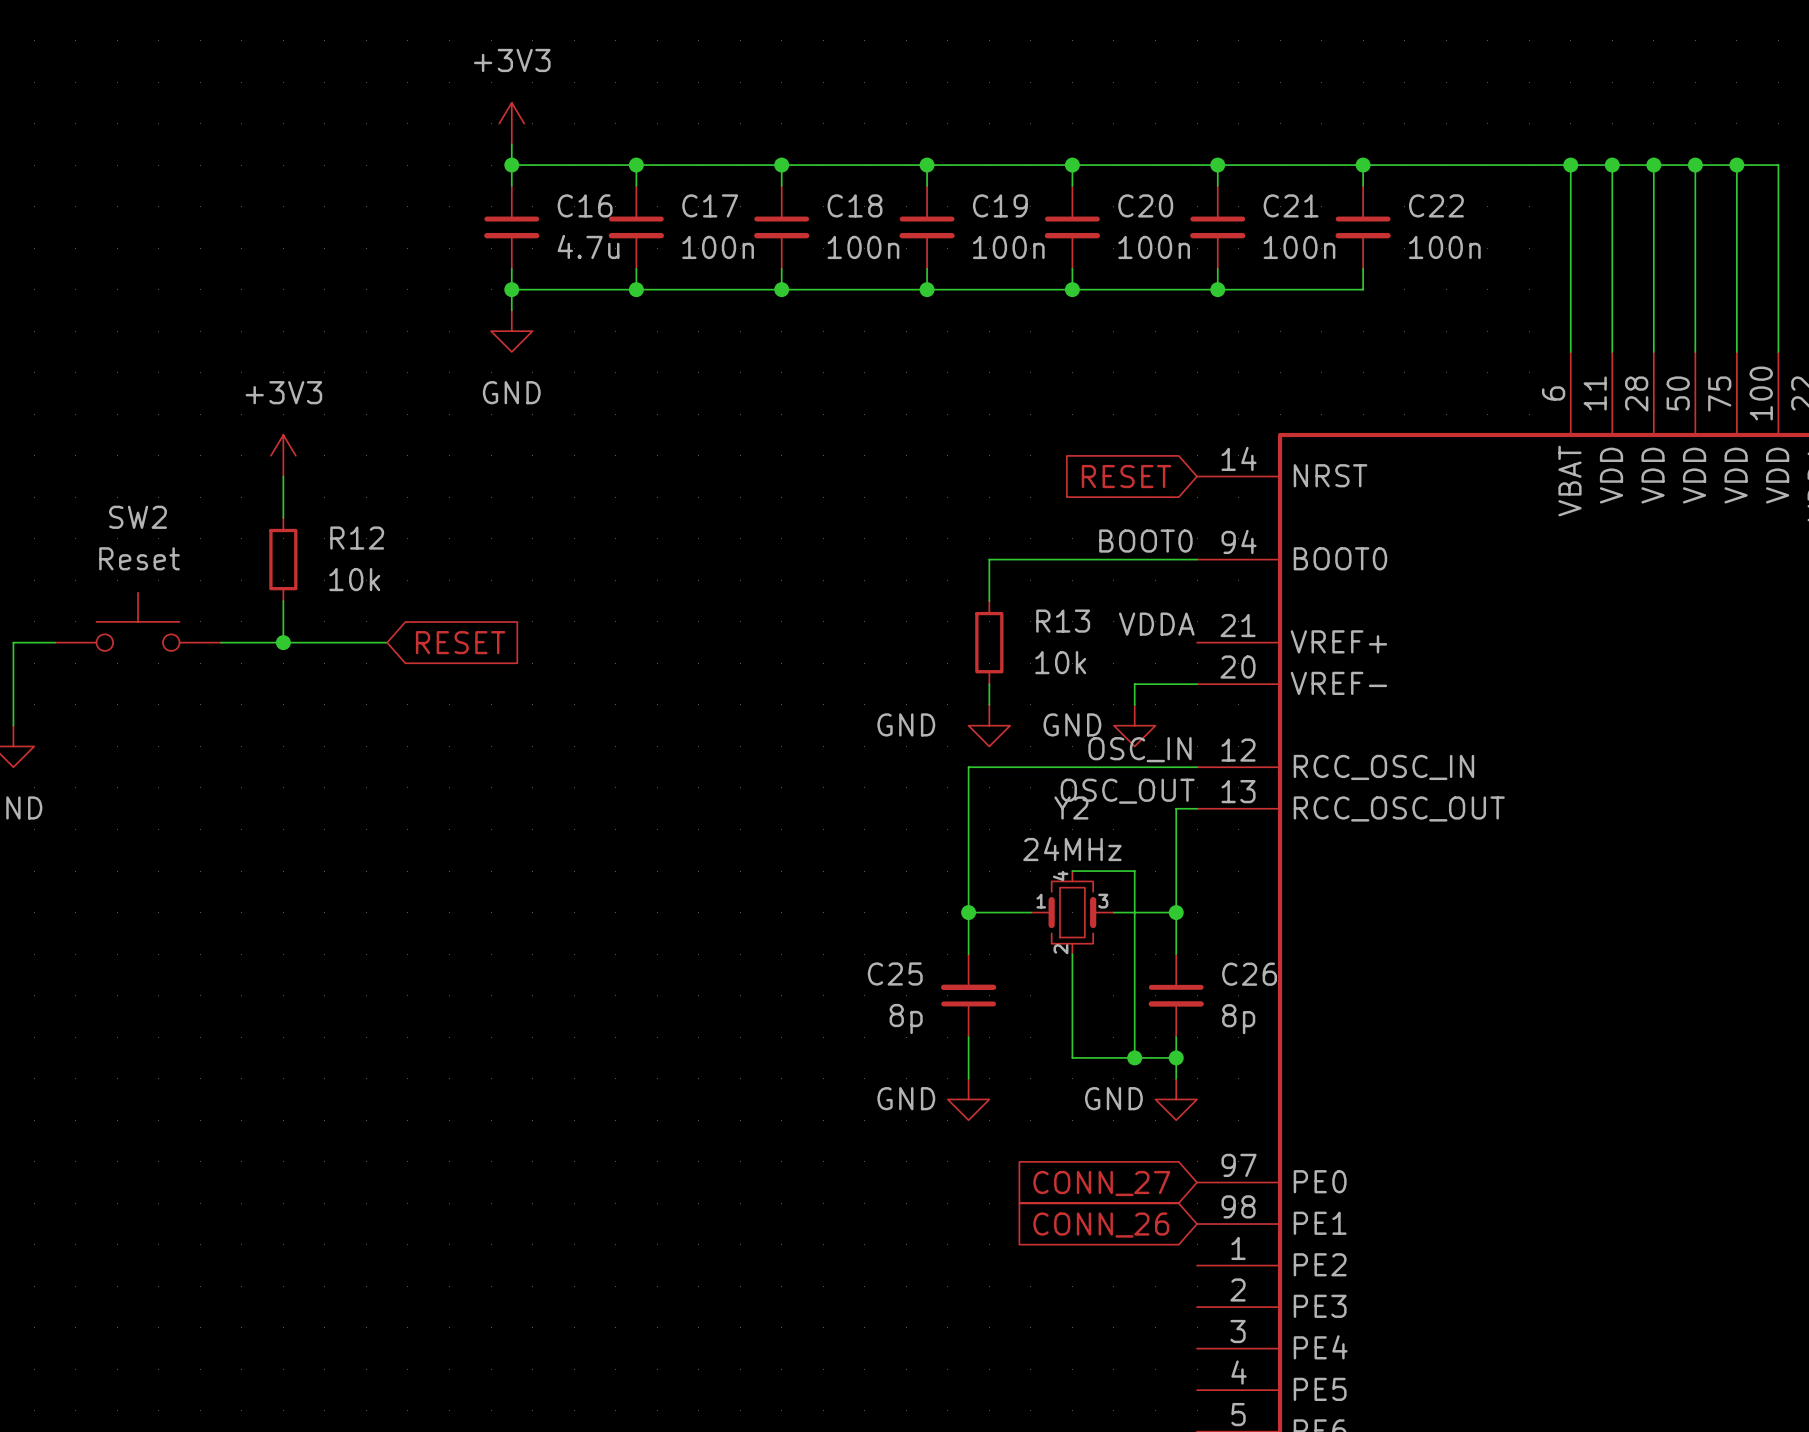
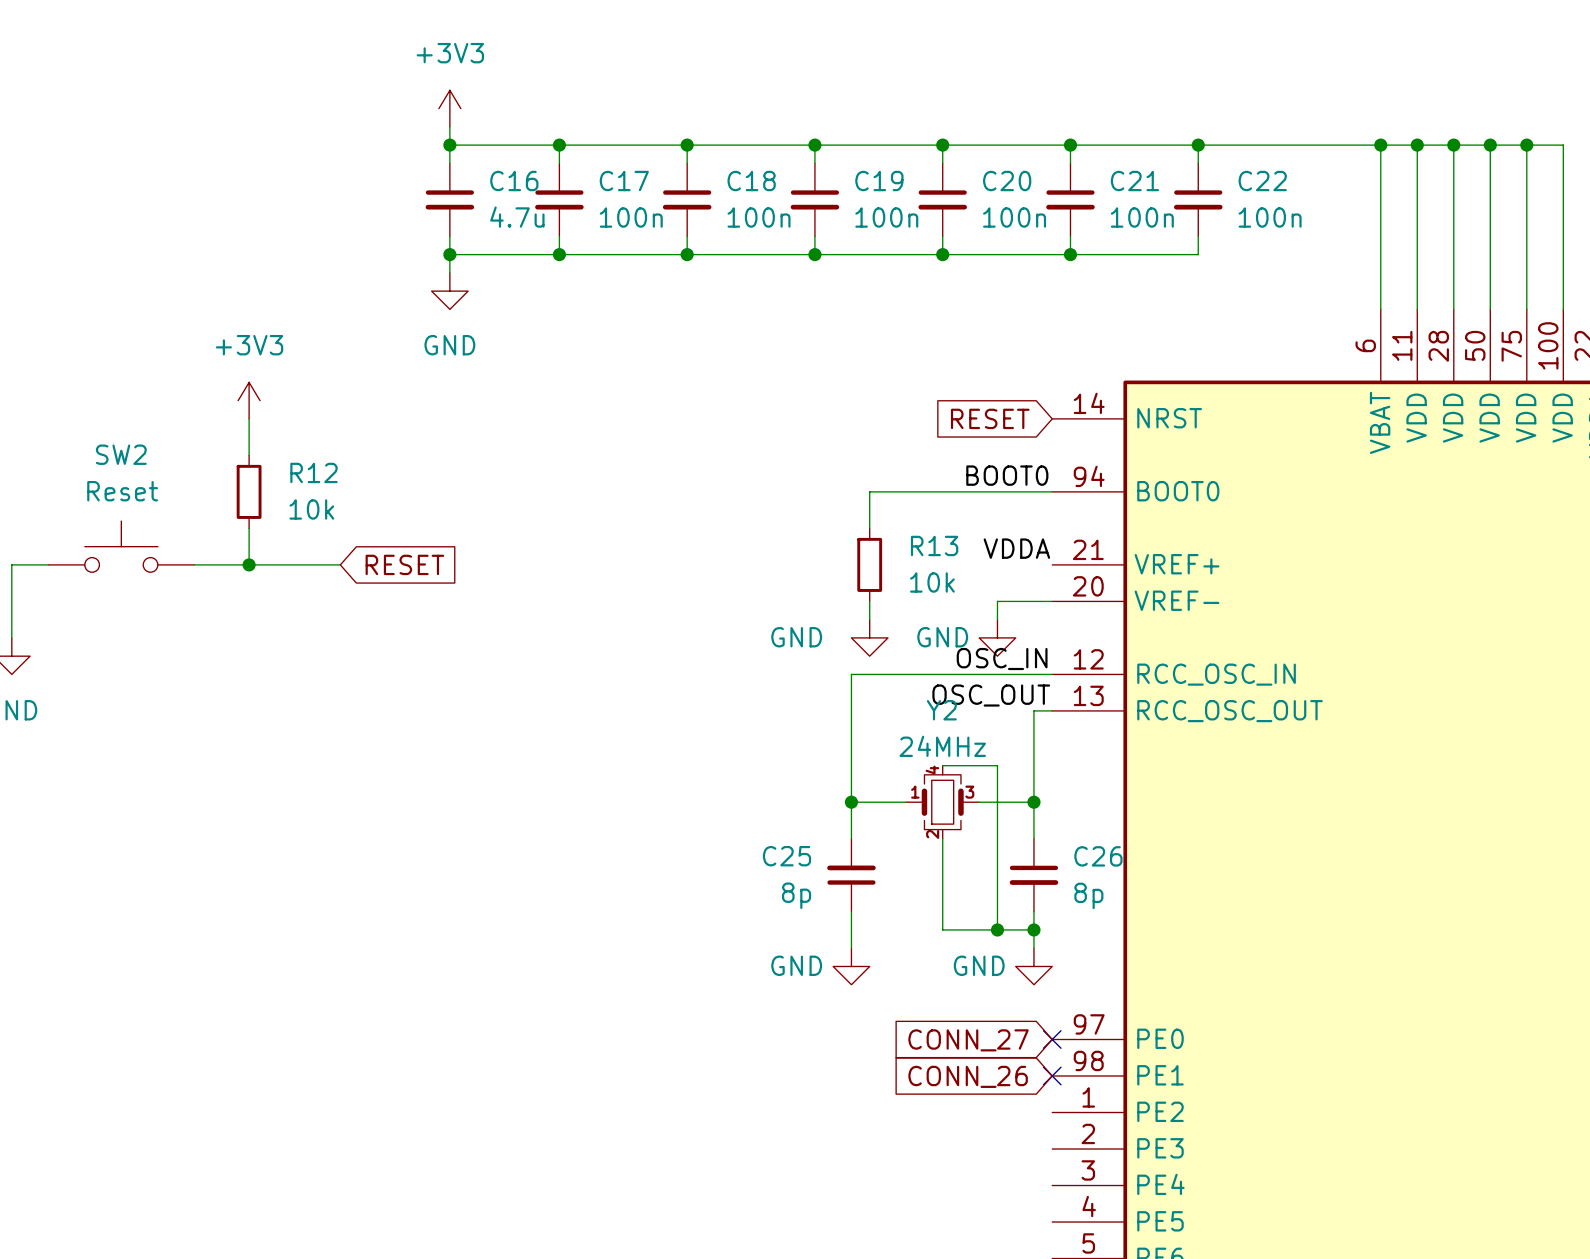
no-connect mark: none -> (1052, 1039)
no-connect mark: none -> (1052, 1075)

